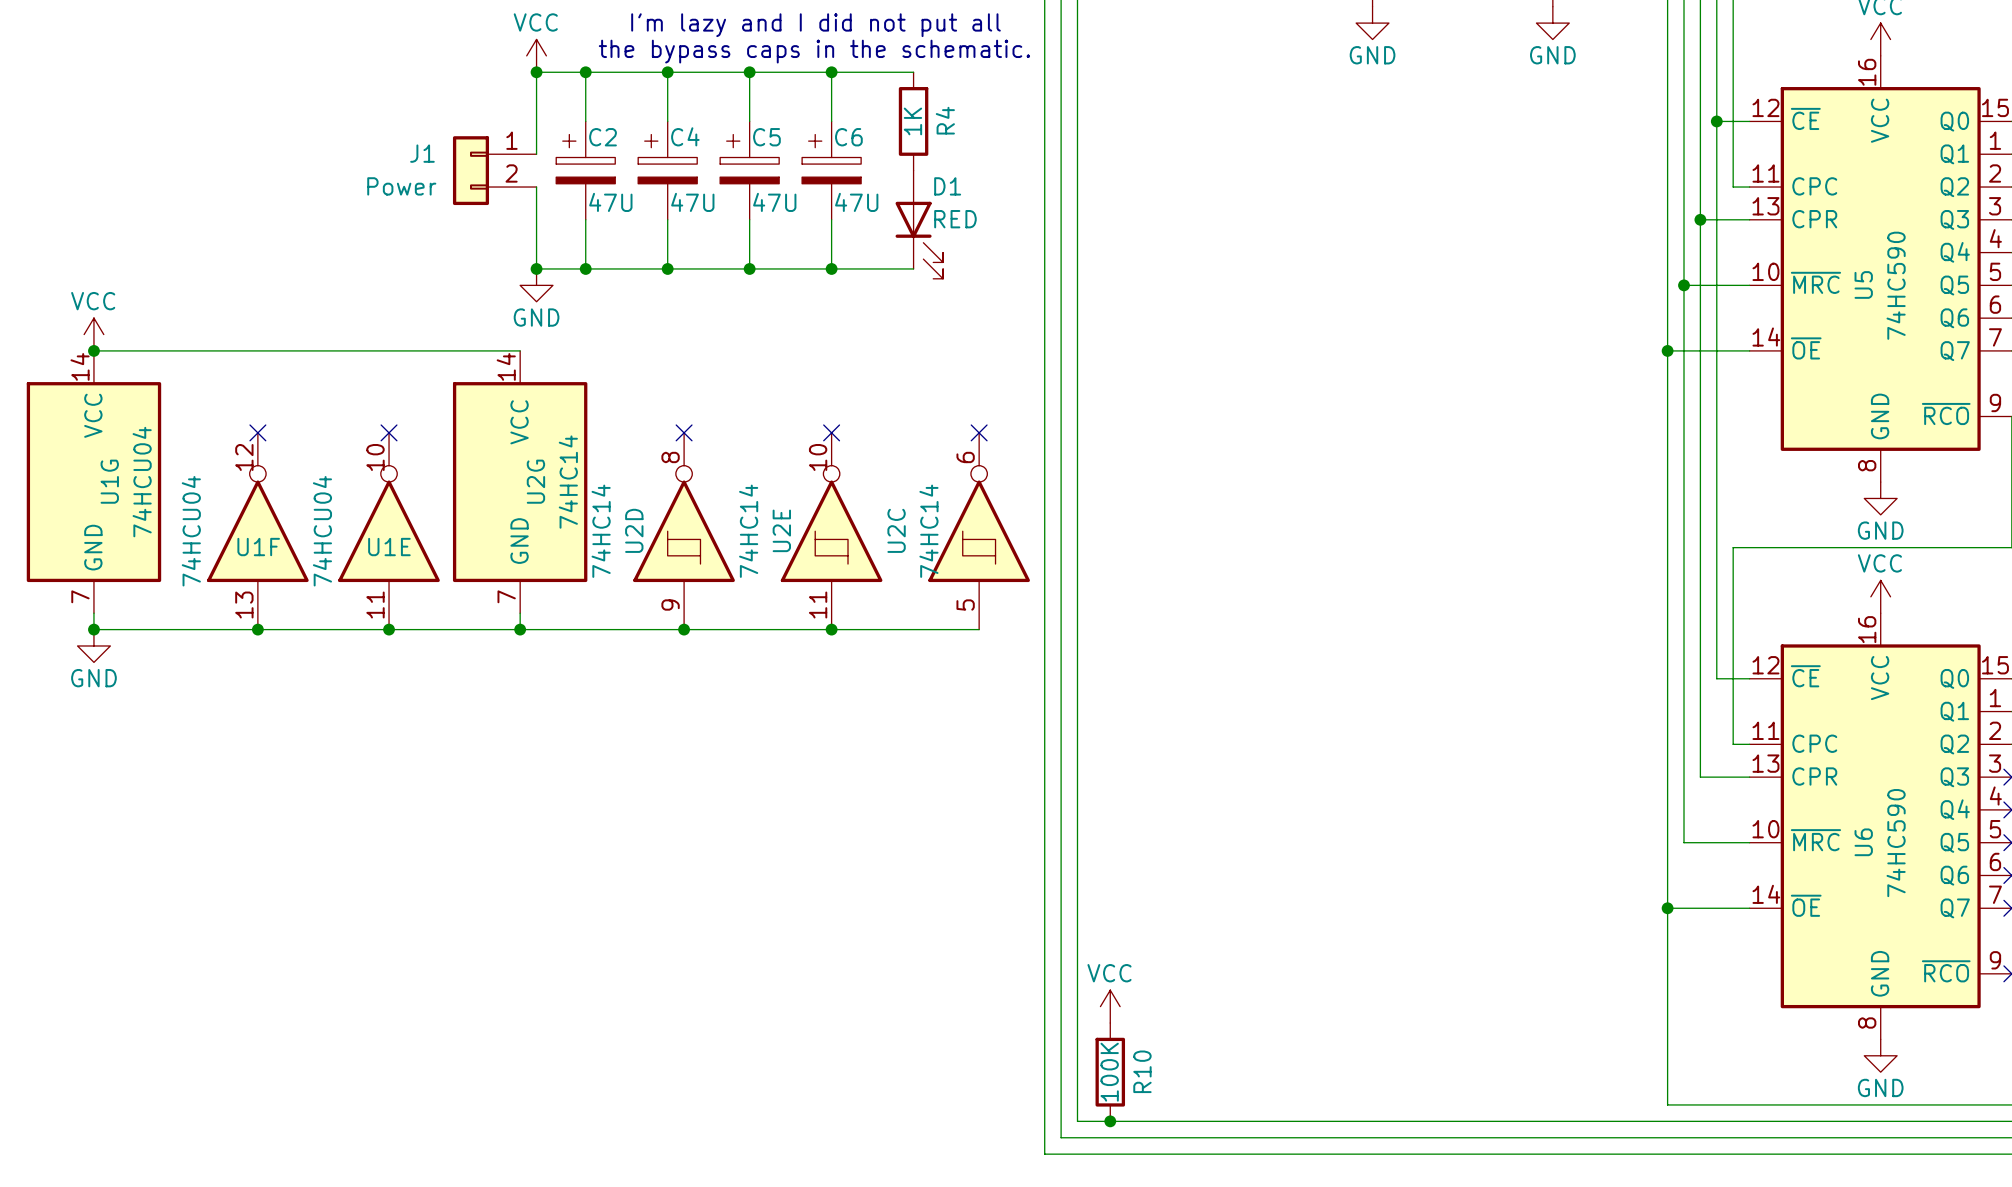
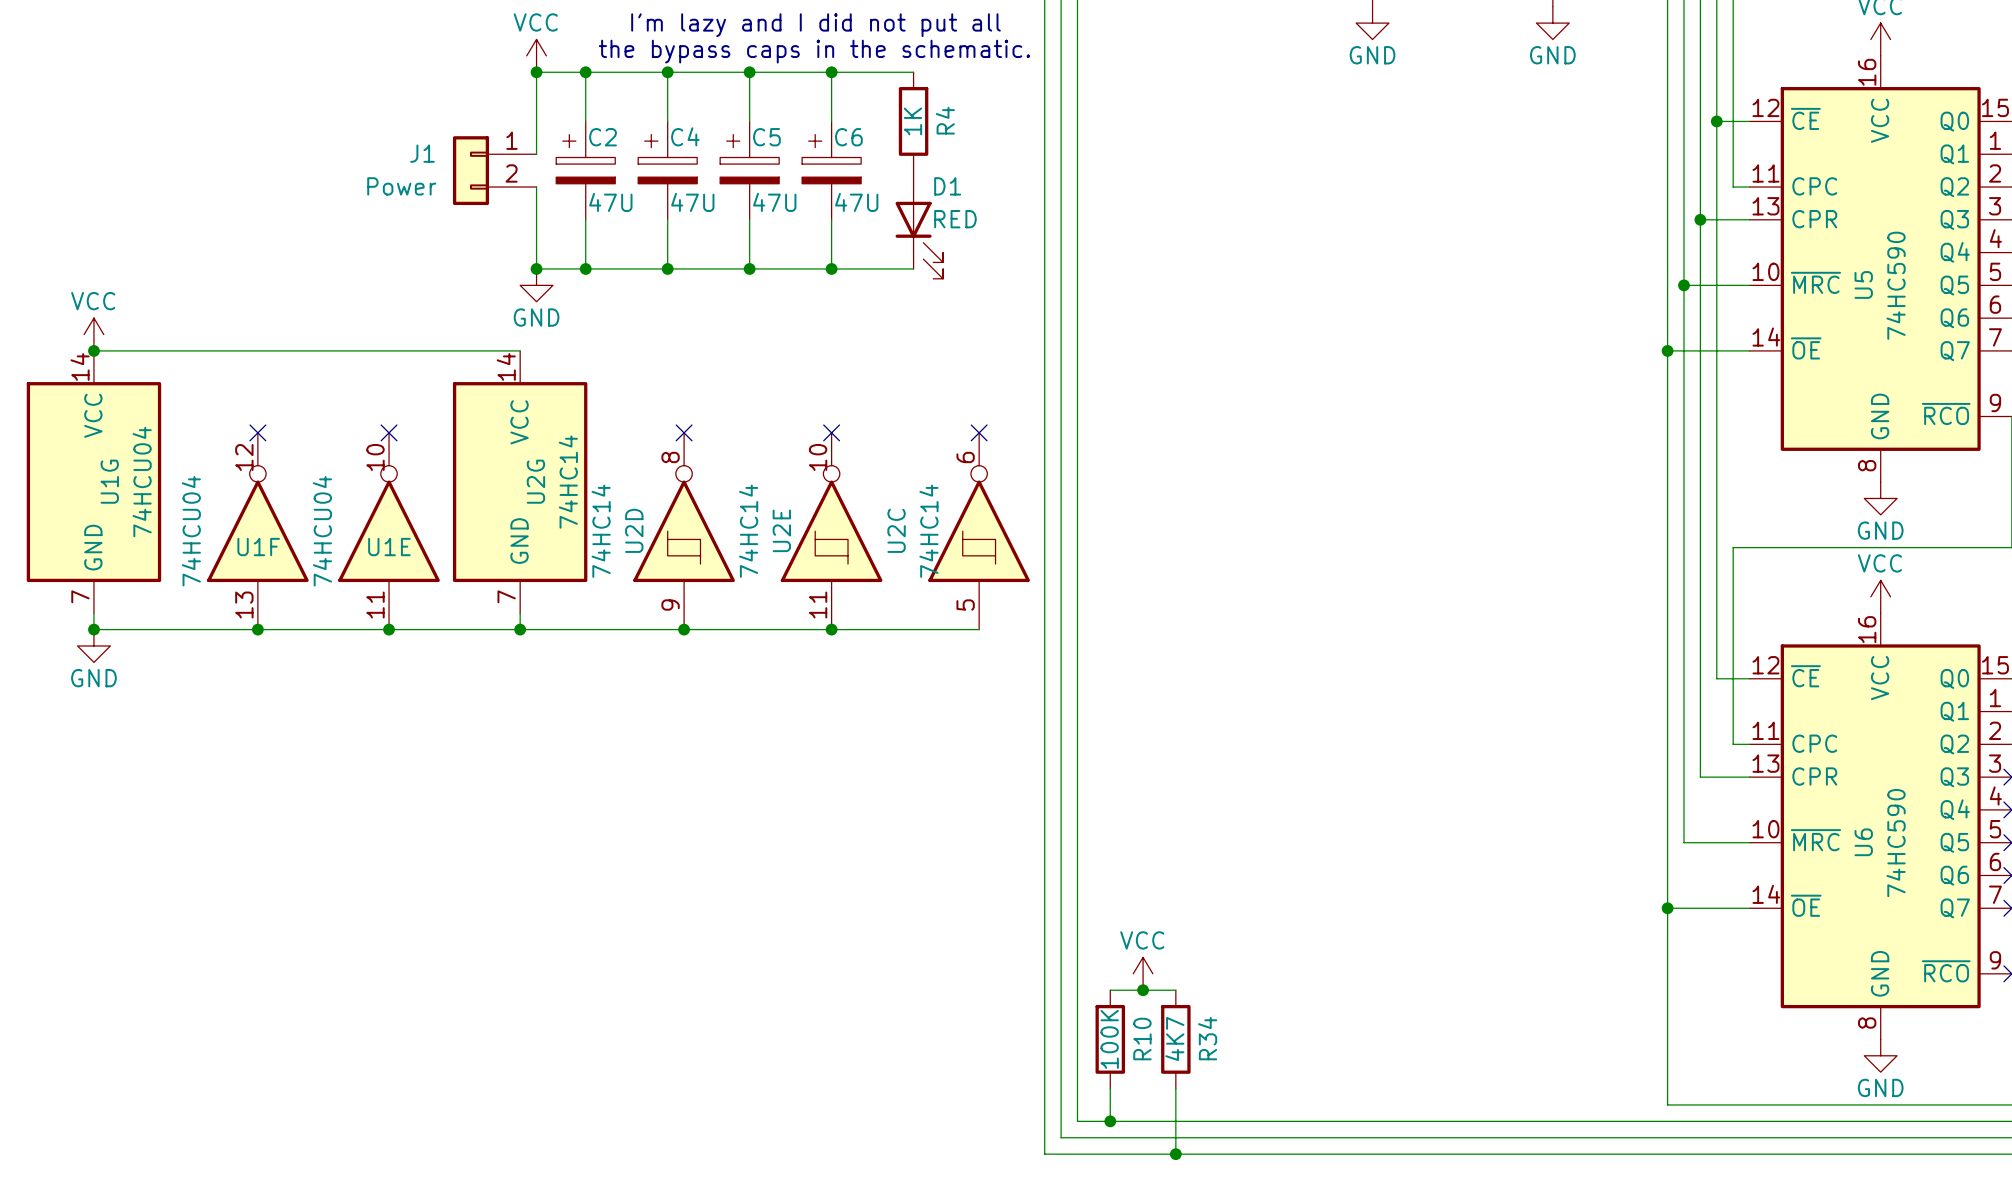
wire: none -> (1110, 990) (1175, 990)
junction: none -> (1143, 990)
power symbol position: VCC (1110, 1006) -> VCC (1143, 973)
R34: none -> 4K7 (1175, 1039)
R10 position: (1110, 1072) -> (1110, 1039)
wire: none -> (1175, 1088) (1175, 1154)
junction: none -> (1175, 1154)

